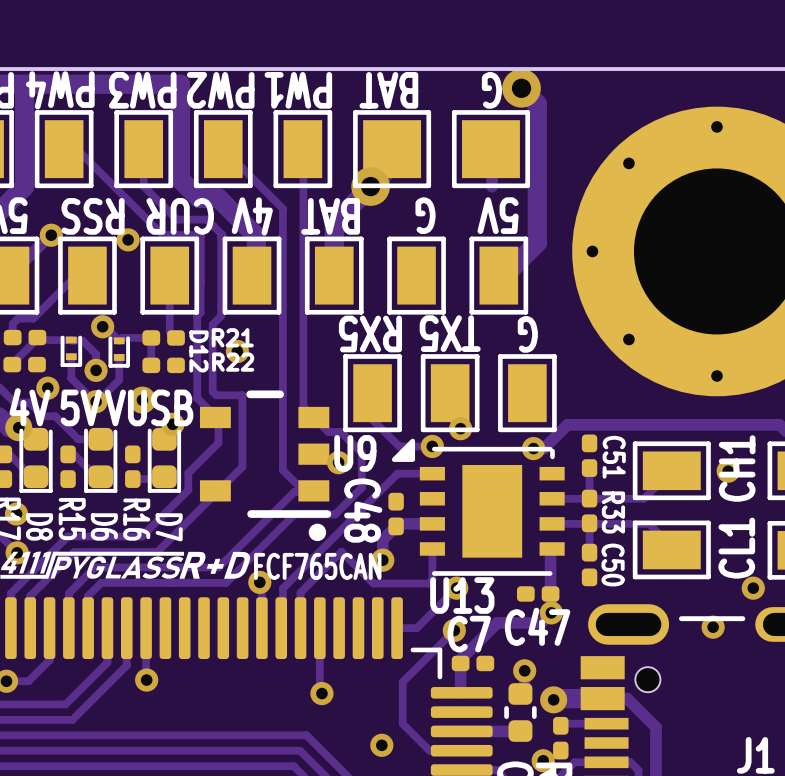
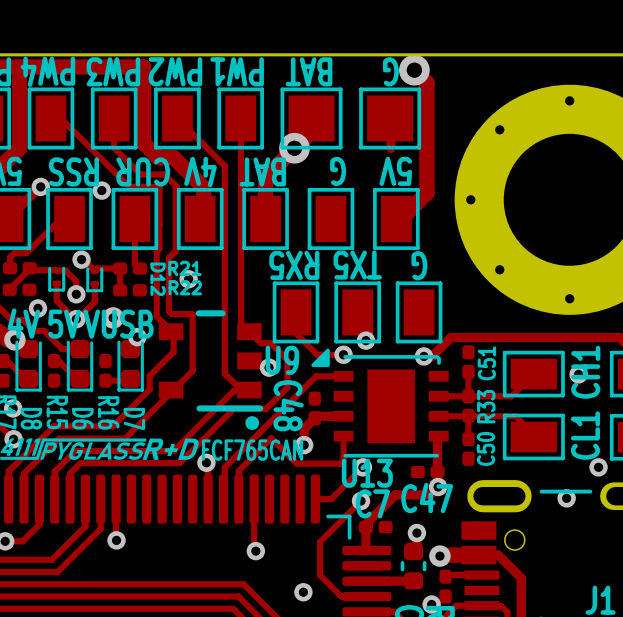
C51 name rotation: 0° (614, 457) -> 180° (486, 363)
R33 name rotation: 0° (613, 512) -> 180° (486, 406)
C50 name rotation: 0° (613, 565) -> 180° (486, 448)

